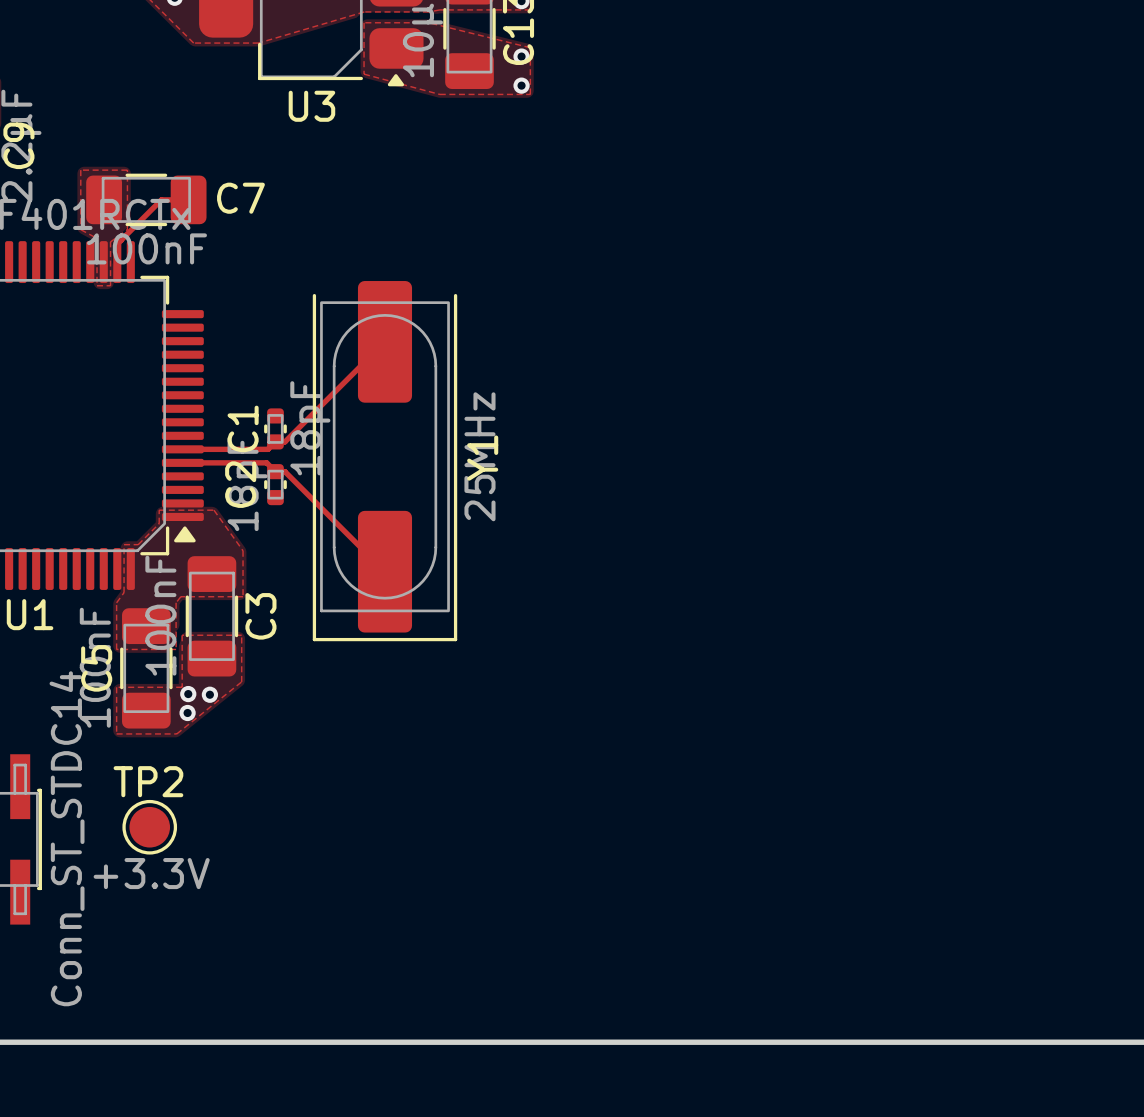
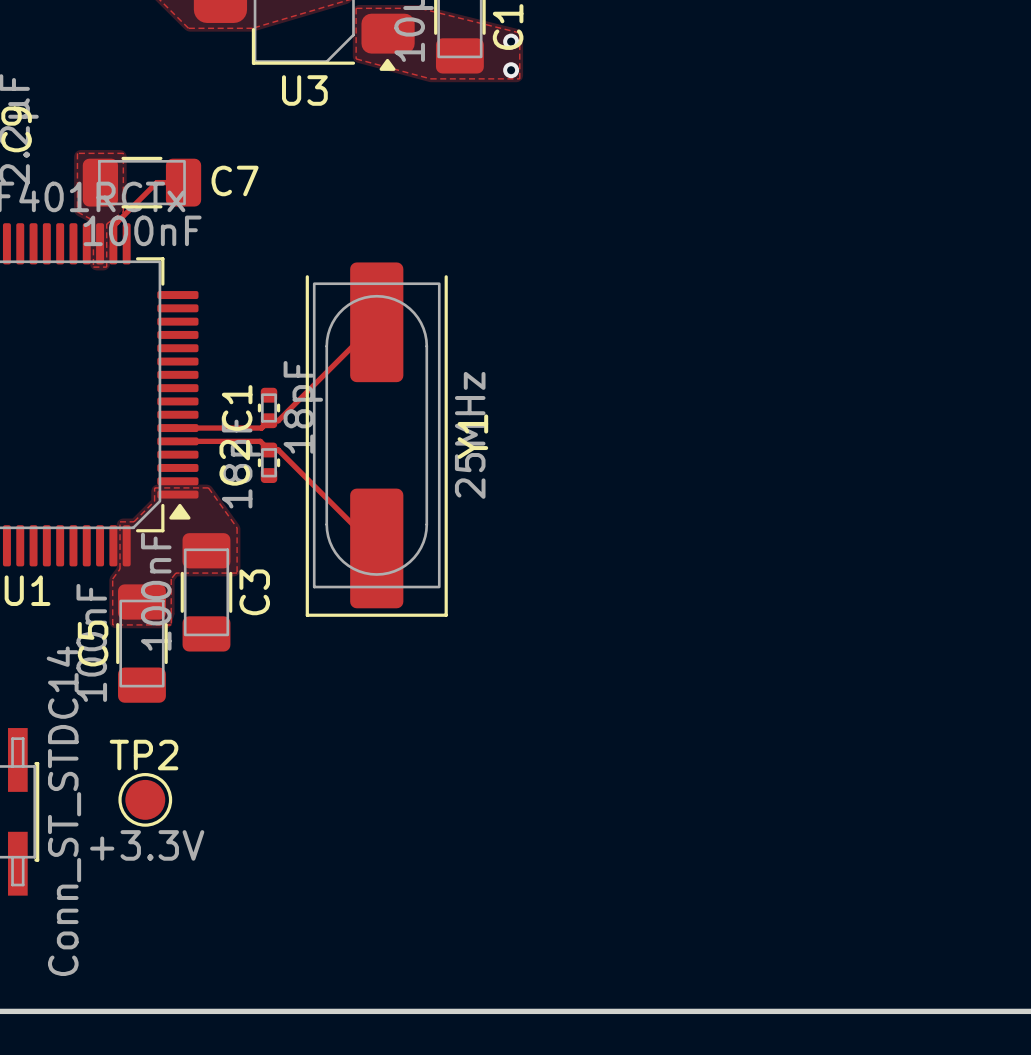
zone outline: (182, 635) (182, 687) (116, 687) (116, 733) (176, 733) (241, 681) (241, 635) (182, 635) -> none
via: (188, 694) -> none
via: (209, 694) -> none
via: (187, 712) -> none

